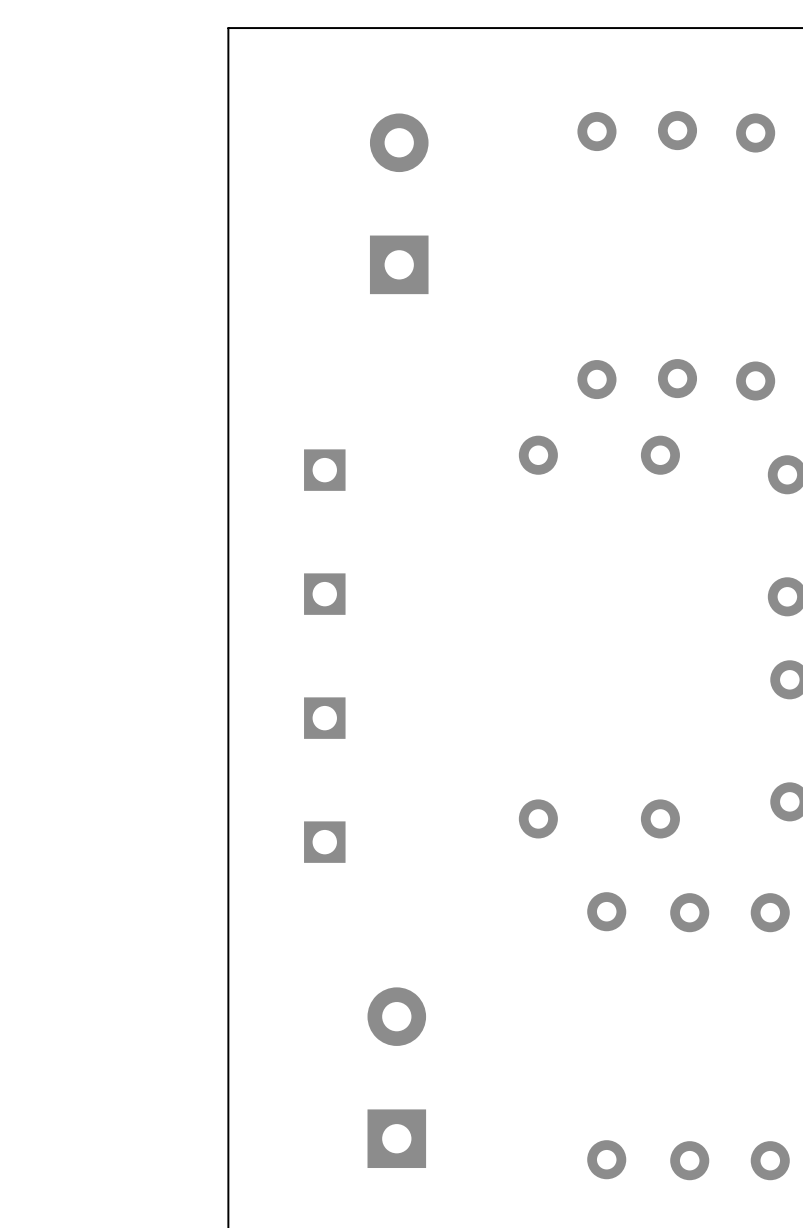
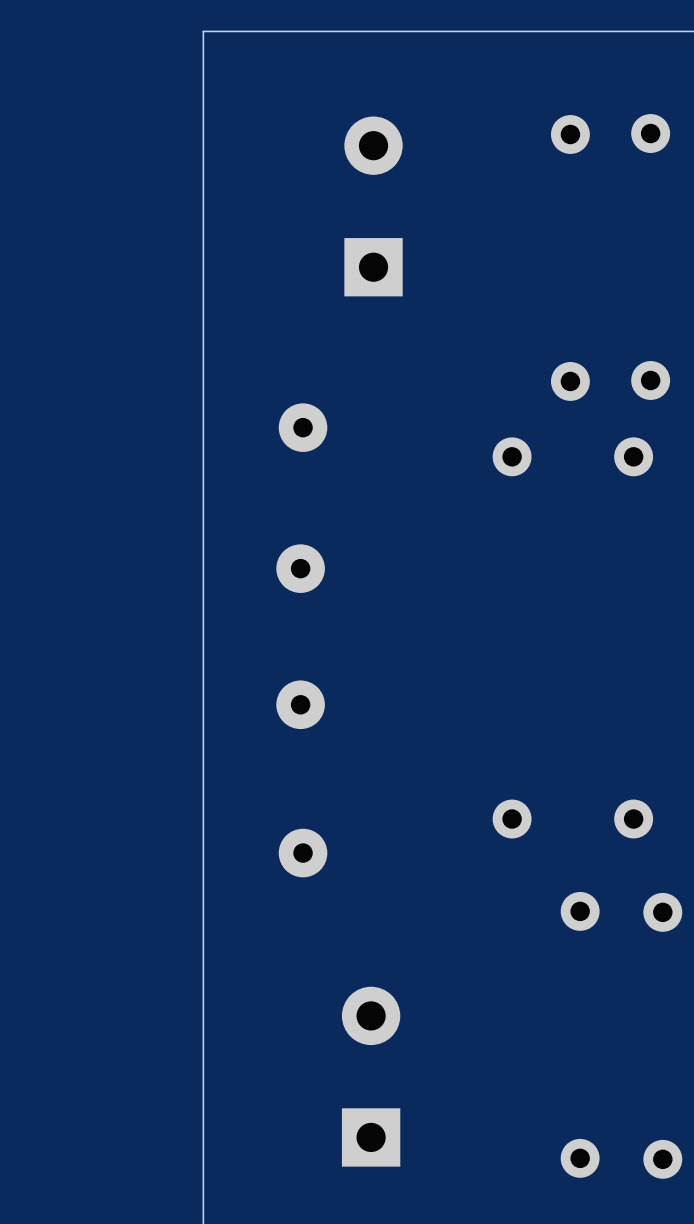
part: none -> (303, 427)
part: (324, 470) -> none
part: none -> (300, 568)
part: (324, 594) -> none
part footprint: [304, 697, 346, 739] -> [276, 680, 325, 730]
part footprint: [304, 821, 346, 863] -> [278, 828, 328, 878]

